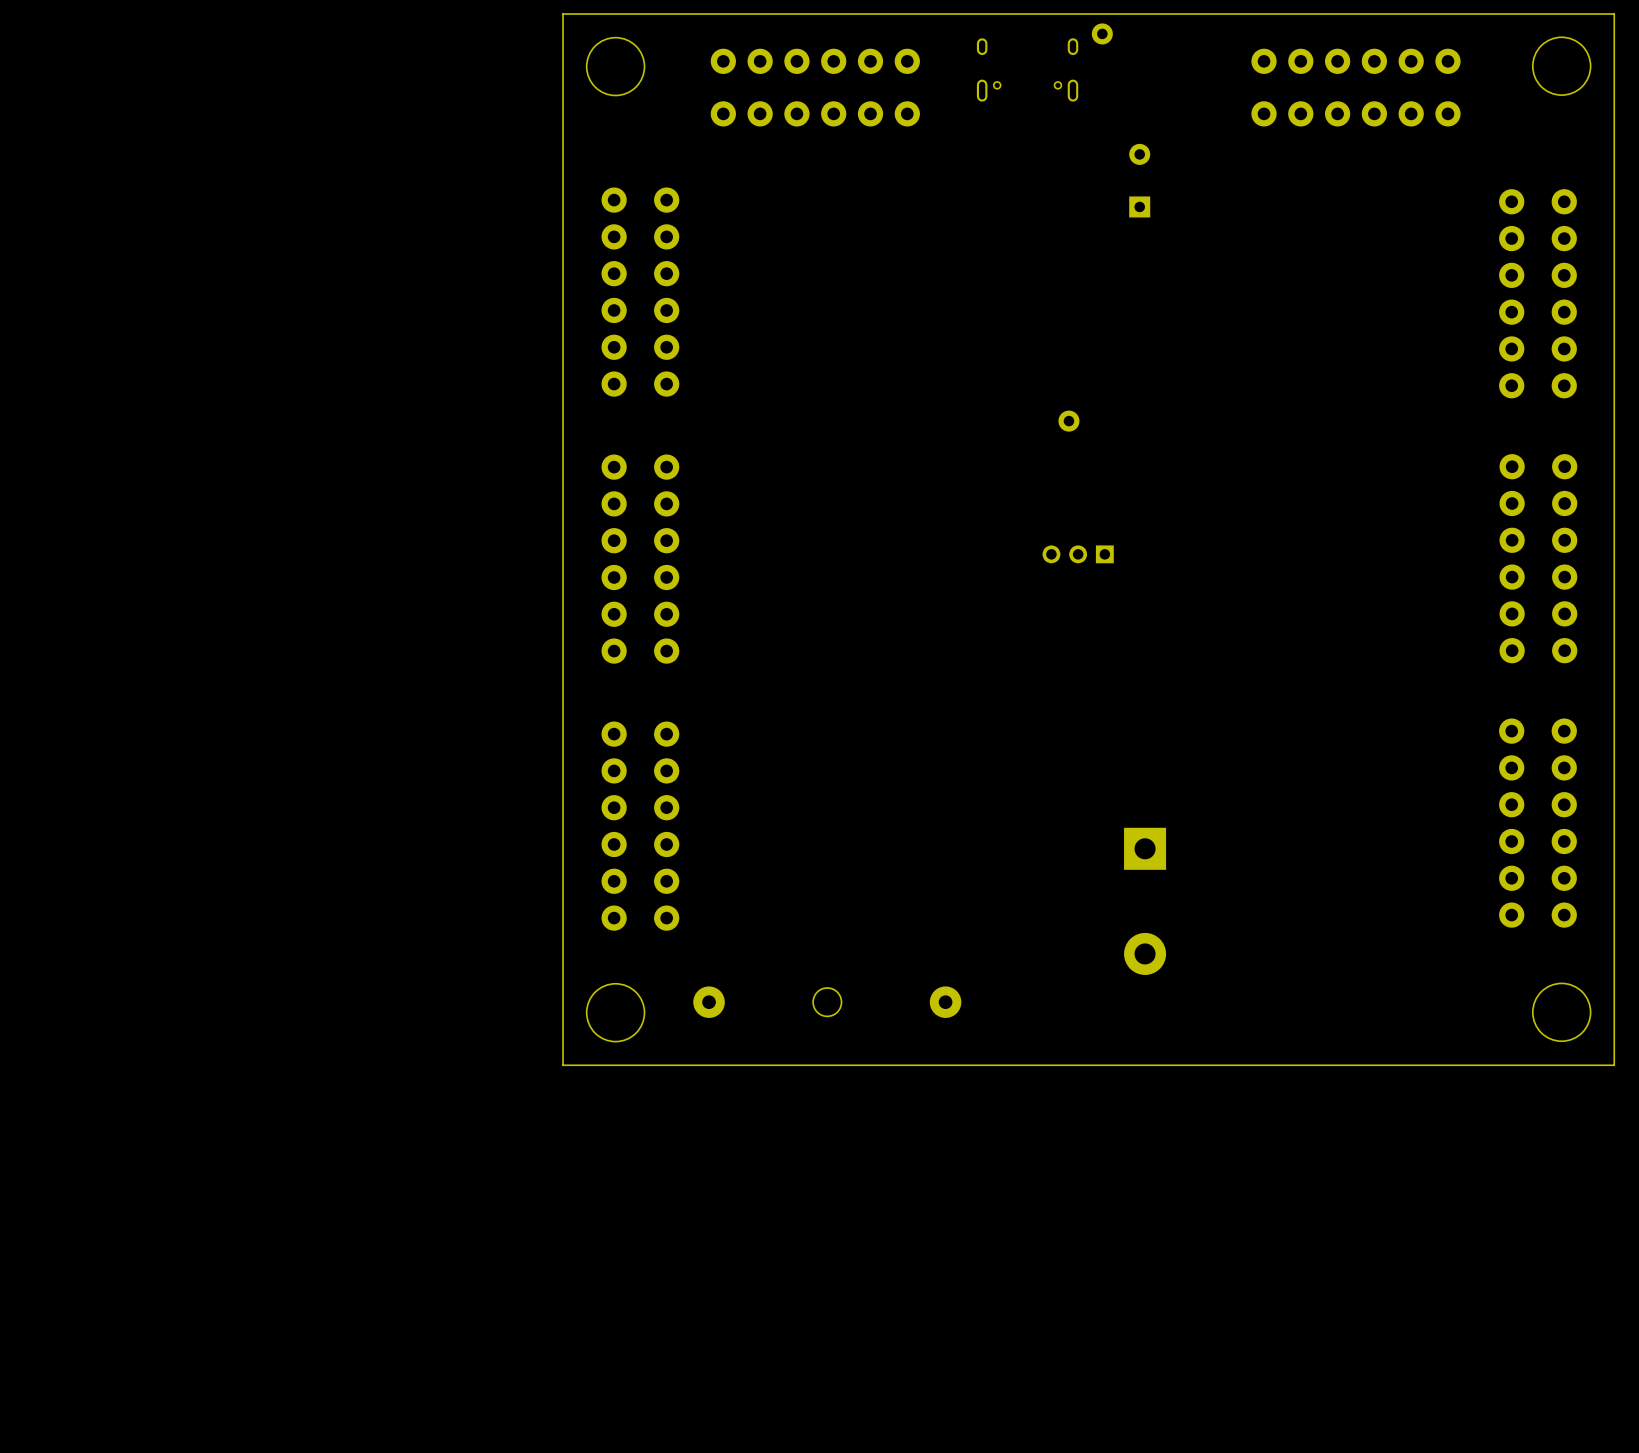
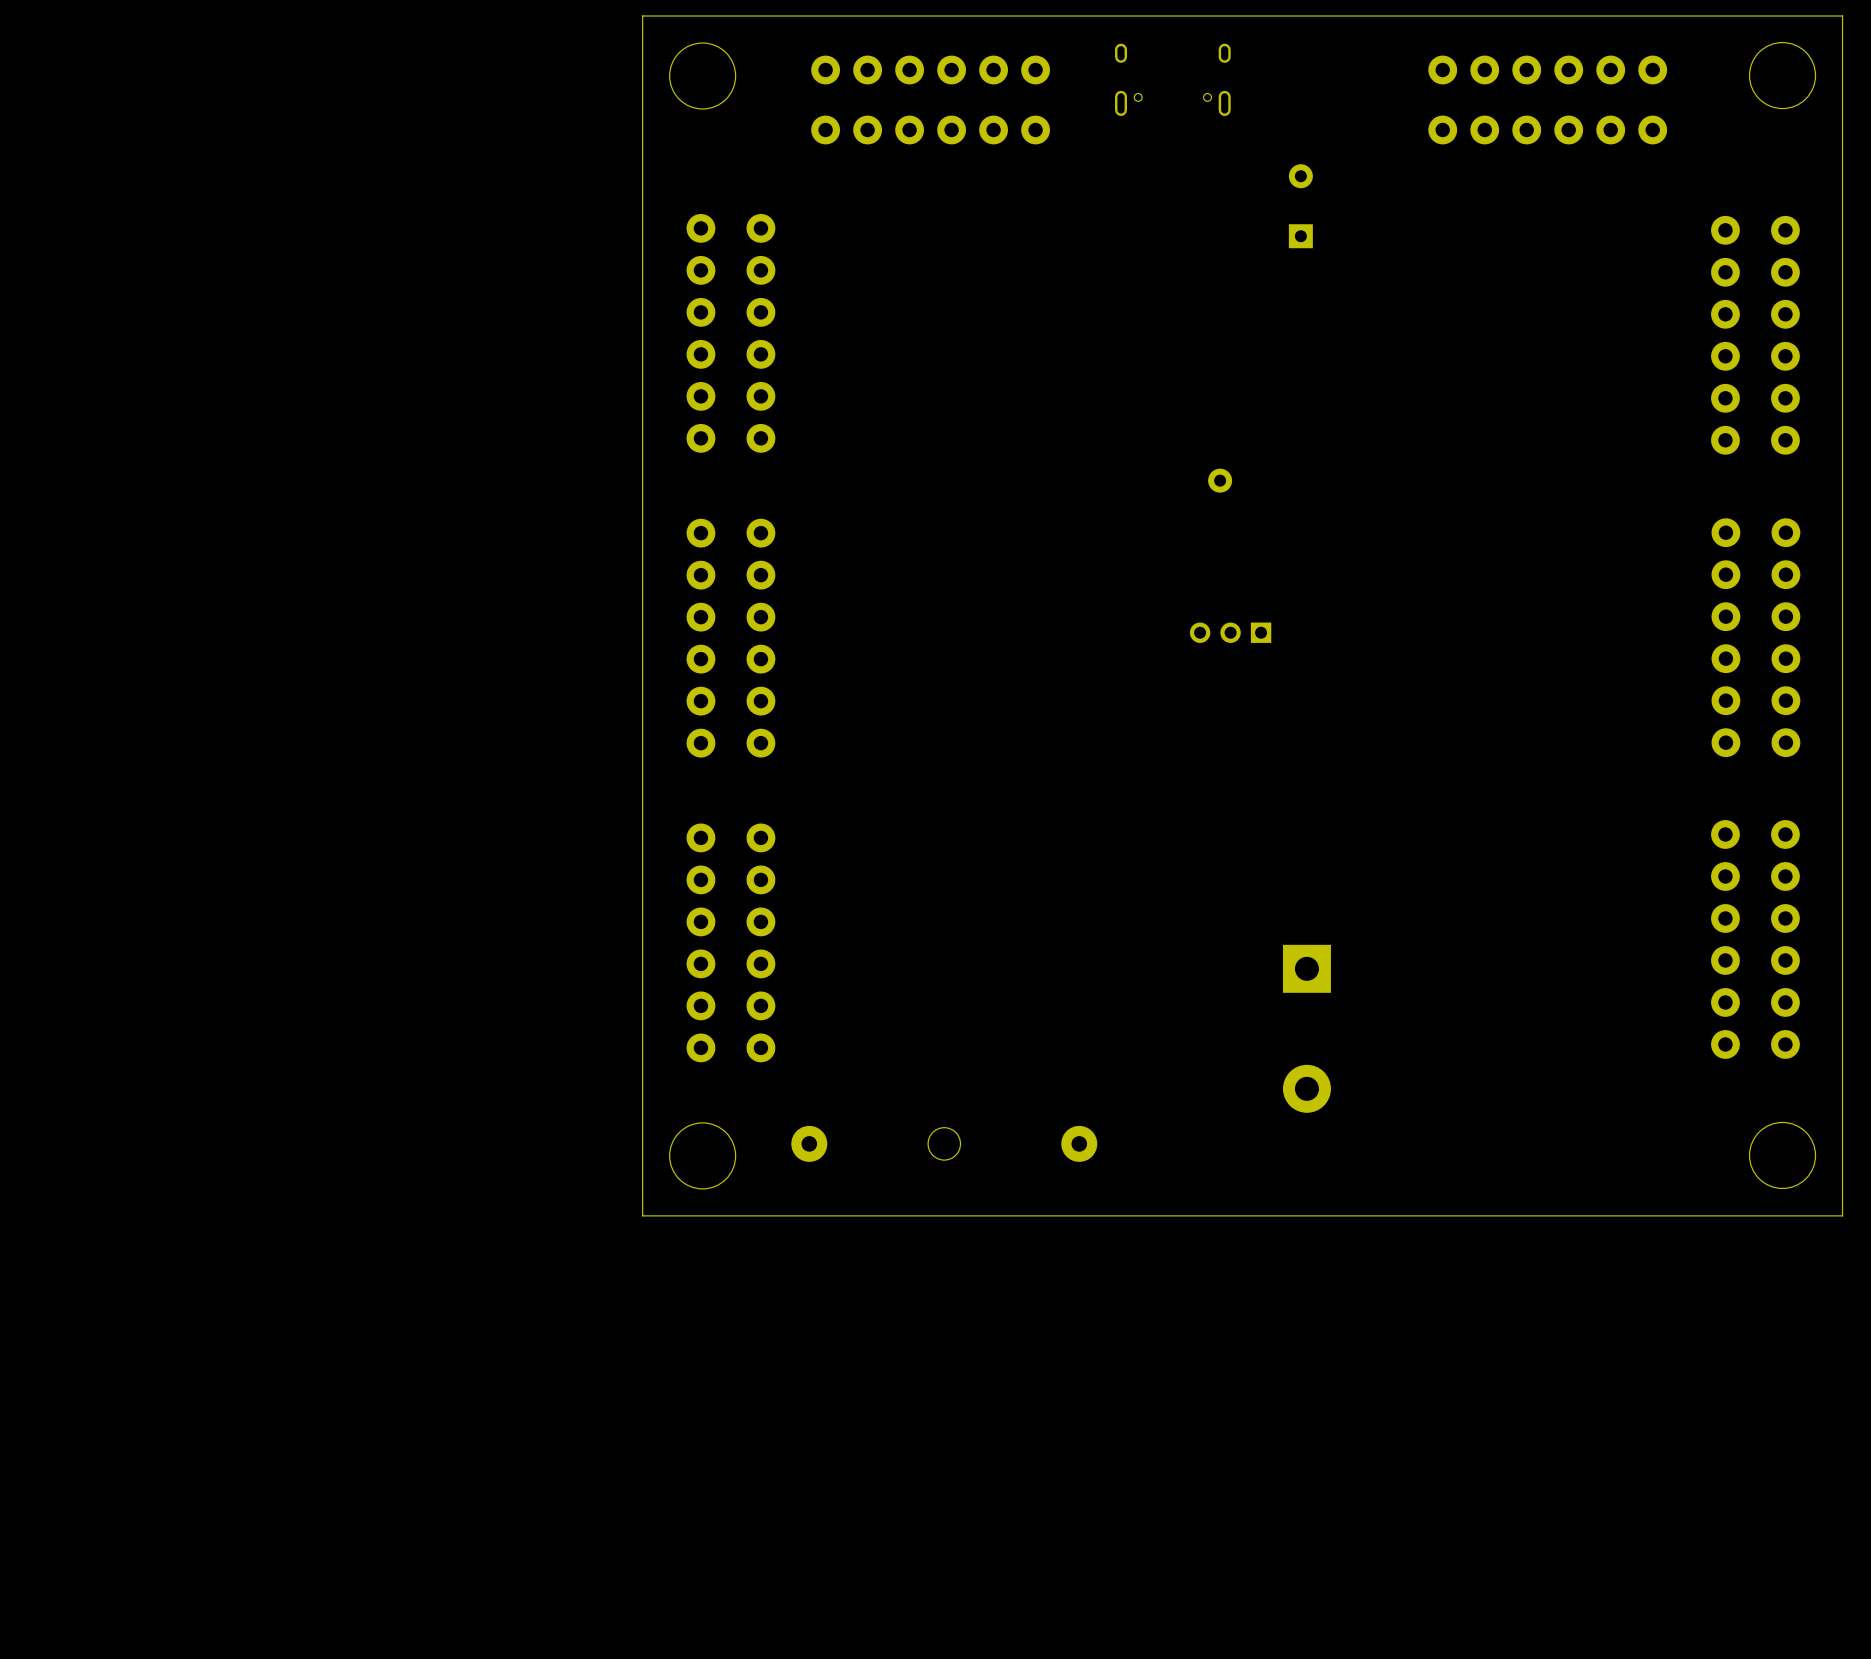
part: (1102, 33) -> none

